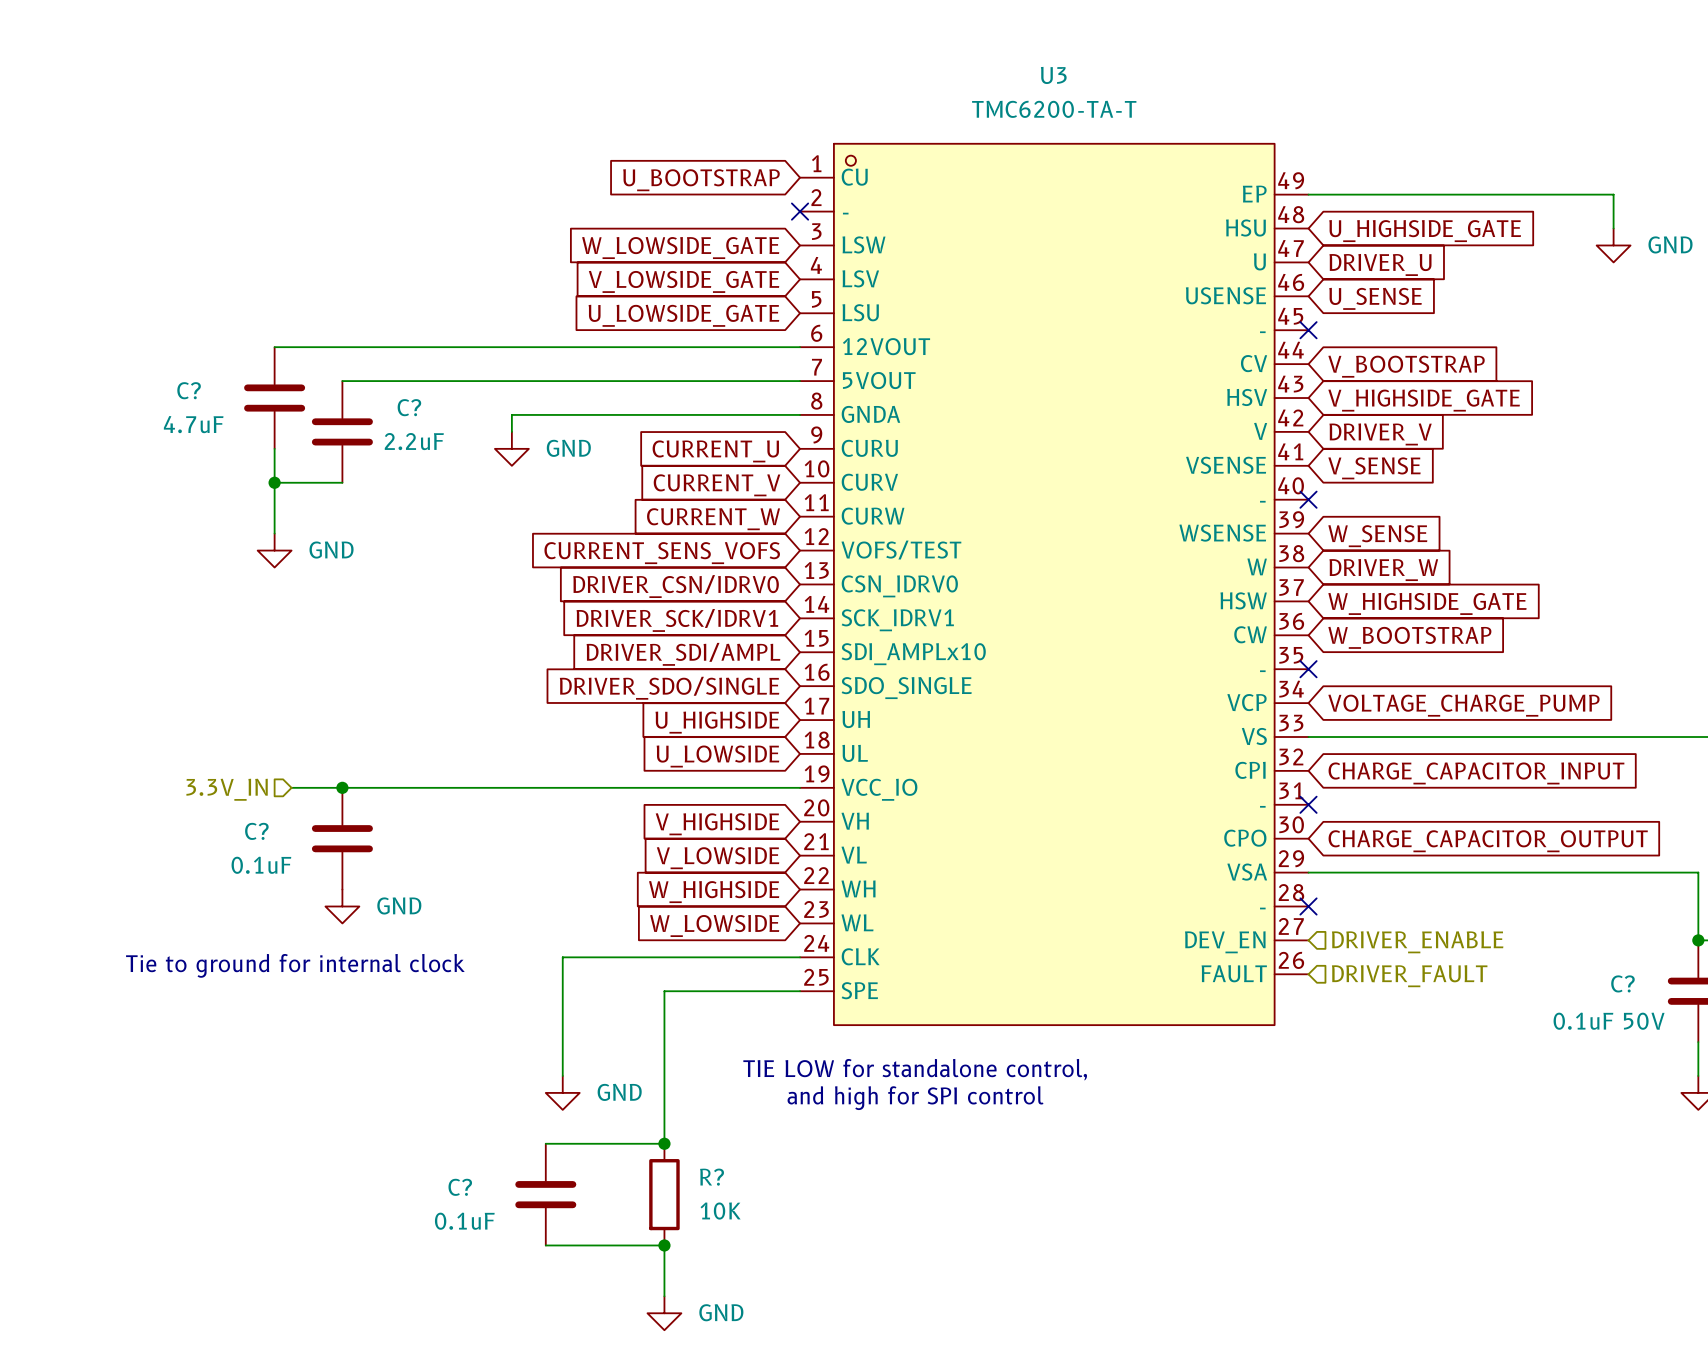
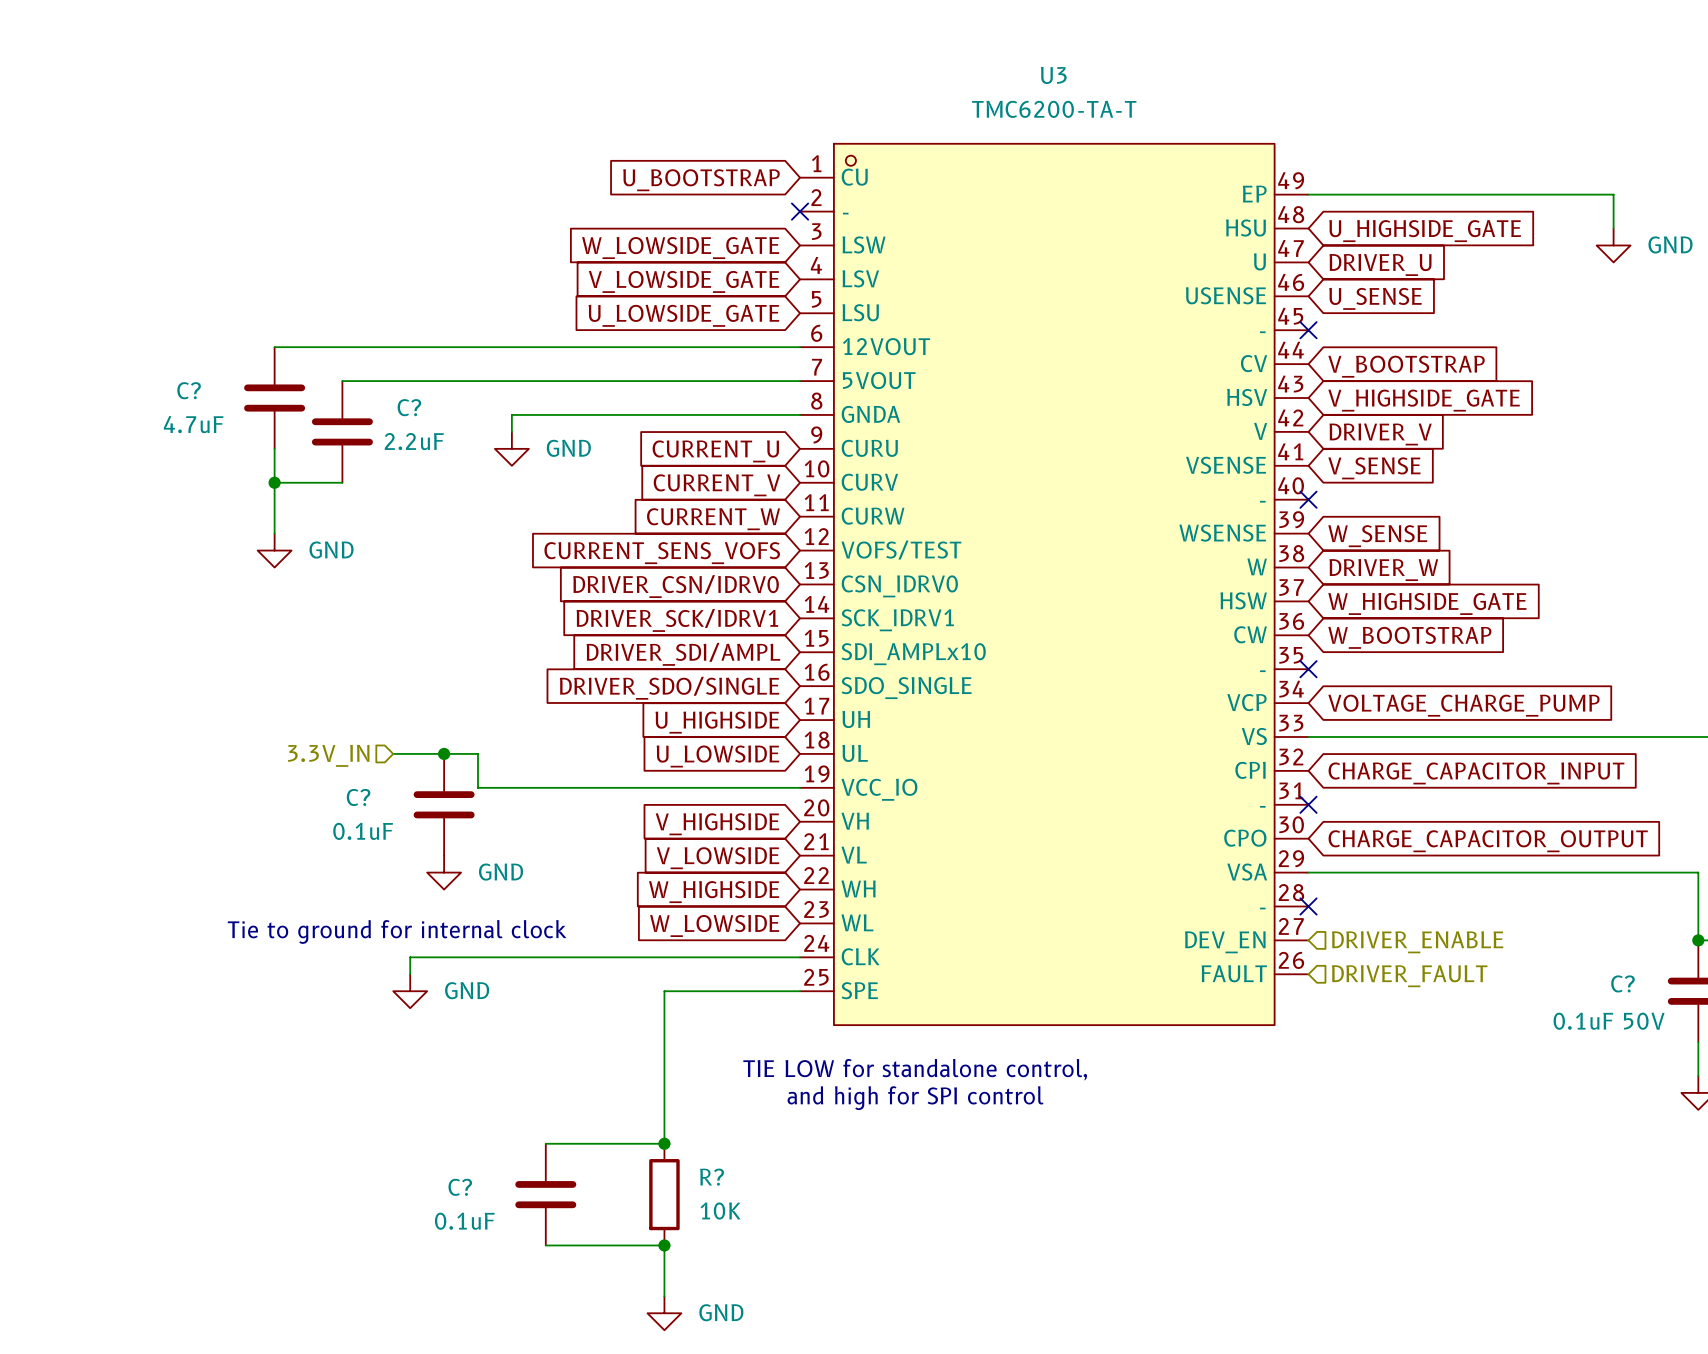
junction: none -> (444, 753)
wire: (291, 787) (478, 787) -> (393, 753) (478, 753) (478, 787)
junction: (342, 787) -> none
hierarchical label position: 3.3V_IN (227, 789) -> 3.3V_IN (328, 755)
C? position: (342, 838) -> (444, 804)
power symbol: none -> GND (444, 872)
power symbol: GND (342, 906) -> none
wire: (562, 957) (562, 1075) -> (562, 957) (410, 957) (410, 974)
text position: Tie to ground for internal clock (295, 965) -> Tie to ground for internal clock (397, 931)
power symbol: none -> GND (410, 991)
power symbol: GND (562, 1092) -> none

